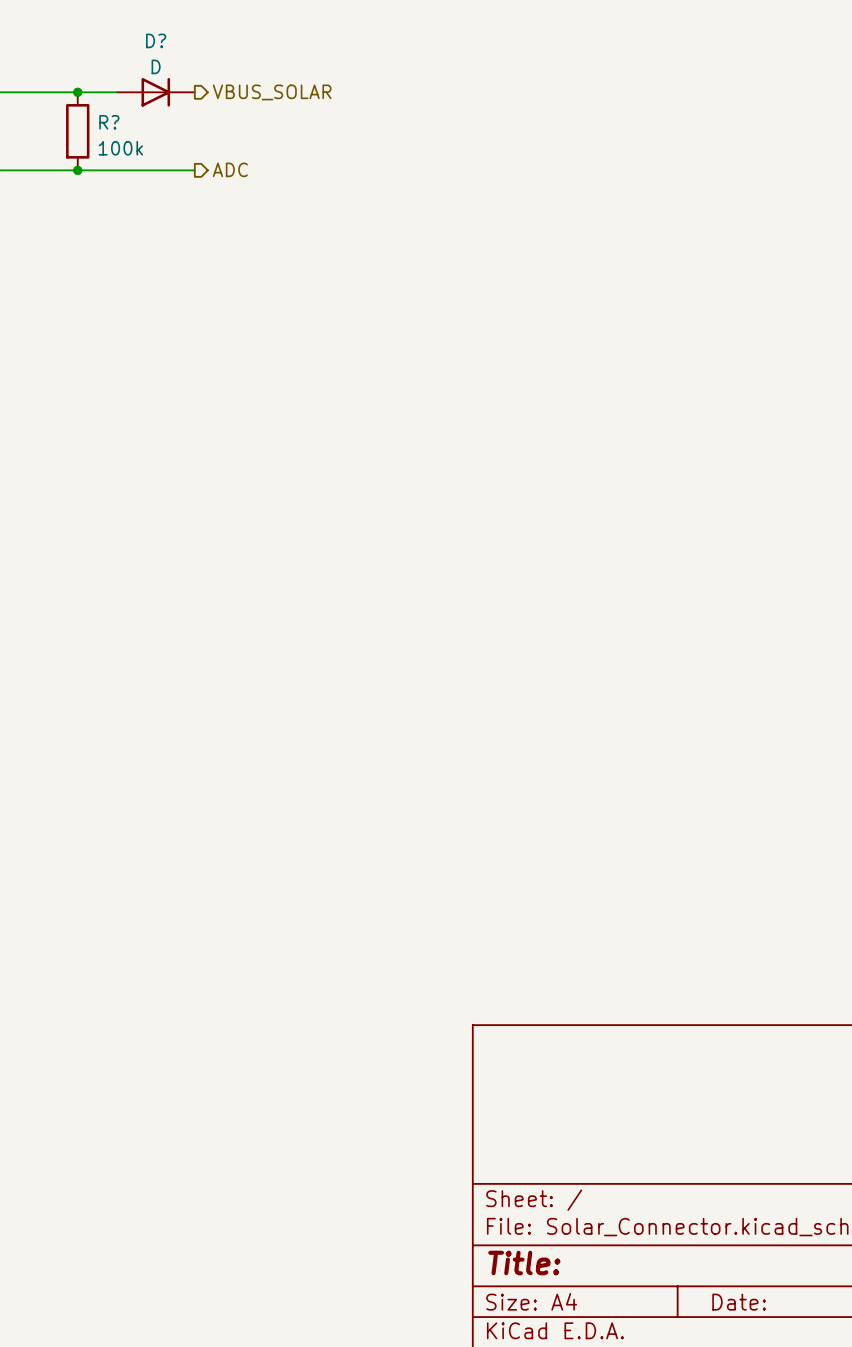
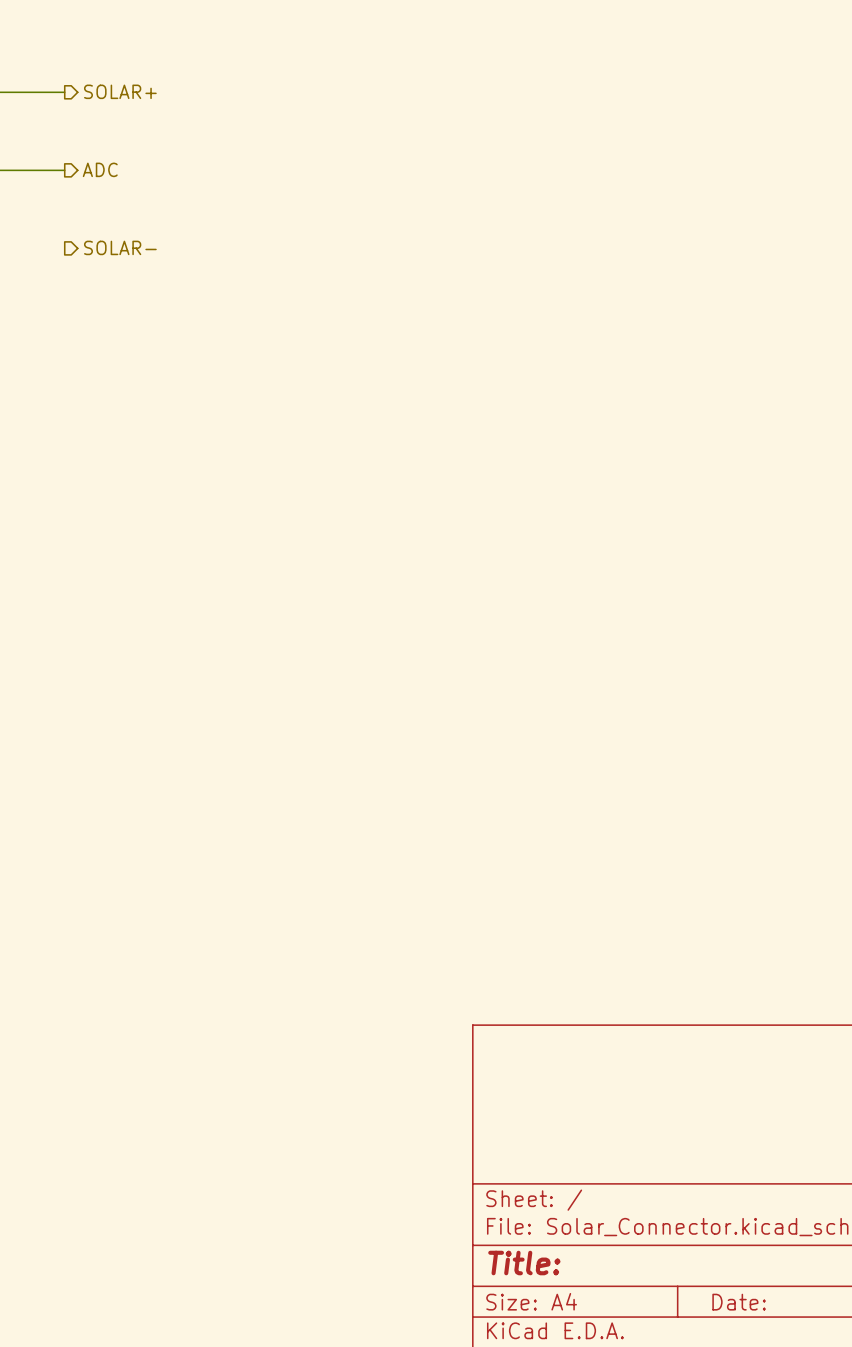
hierarchical label: none -> SOLAR+ (120, 91)
wire: (64, 92) (116, 92) -> none
junction: (77, 92) -> none
D?: D (155, 92) -> none
hierarchical label: VBUS_SOLAR (272, 92) -> none
R?: 100k (77, 131) -> none
hierarchical label position: ADC (230, 169) -> ADC (100, 169)
wire: (64, 170) (194, 170) -> none
junction: (77, 170) -> none
hierarchical label: none -> SOLAR- (120, 247)

